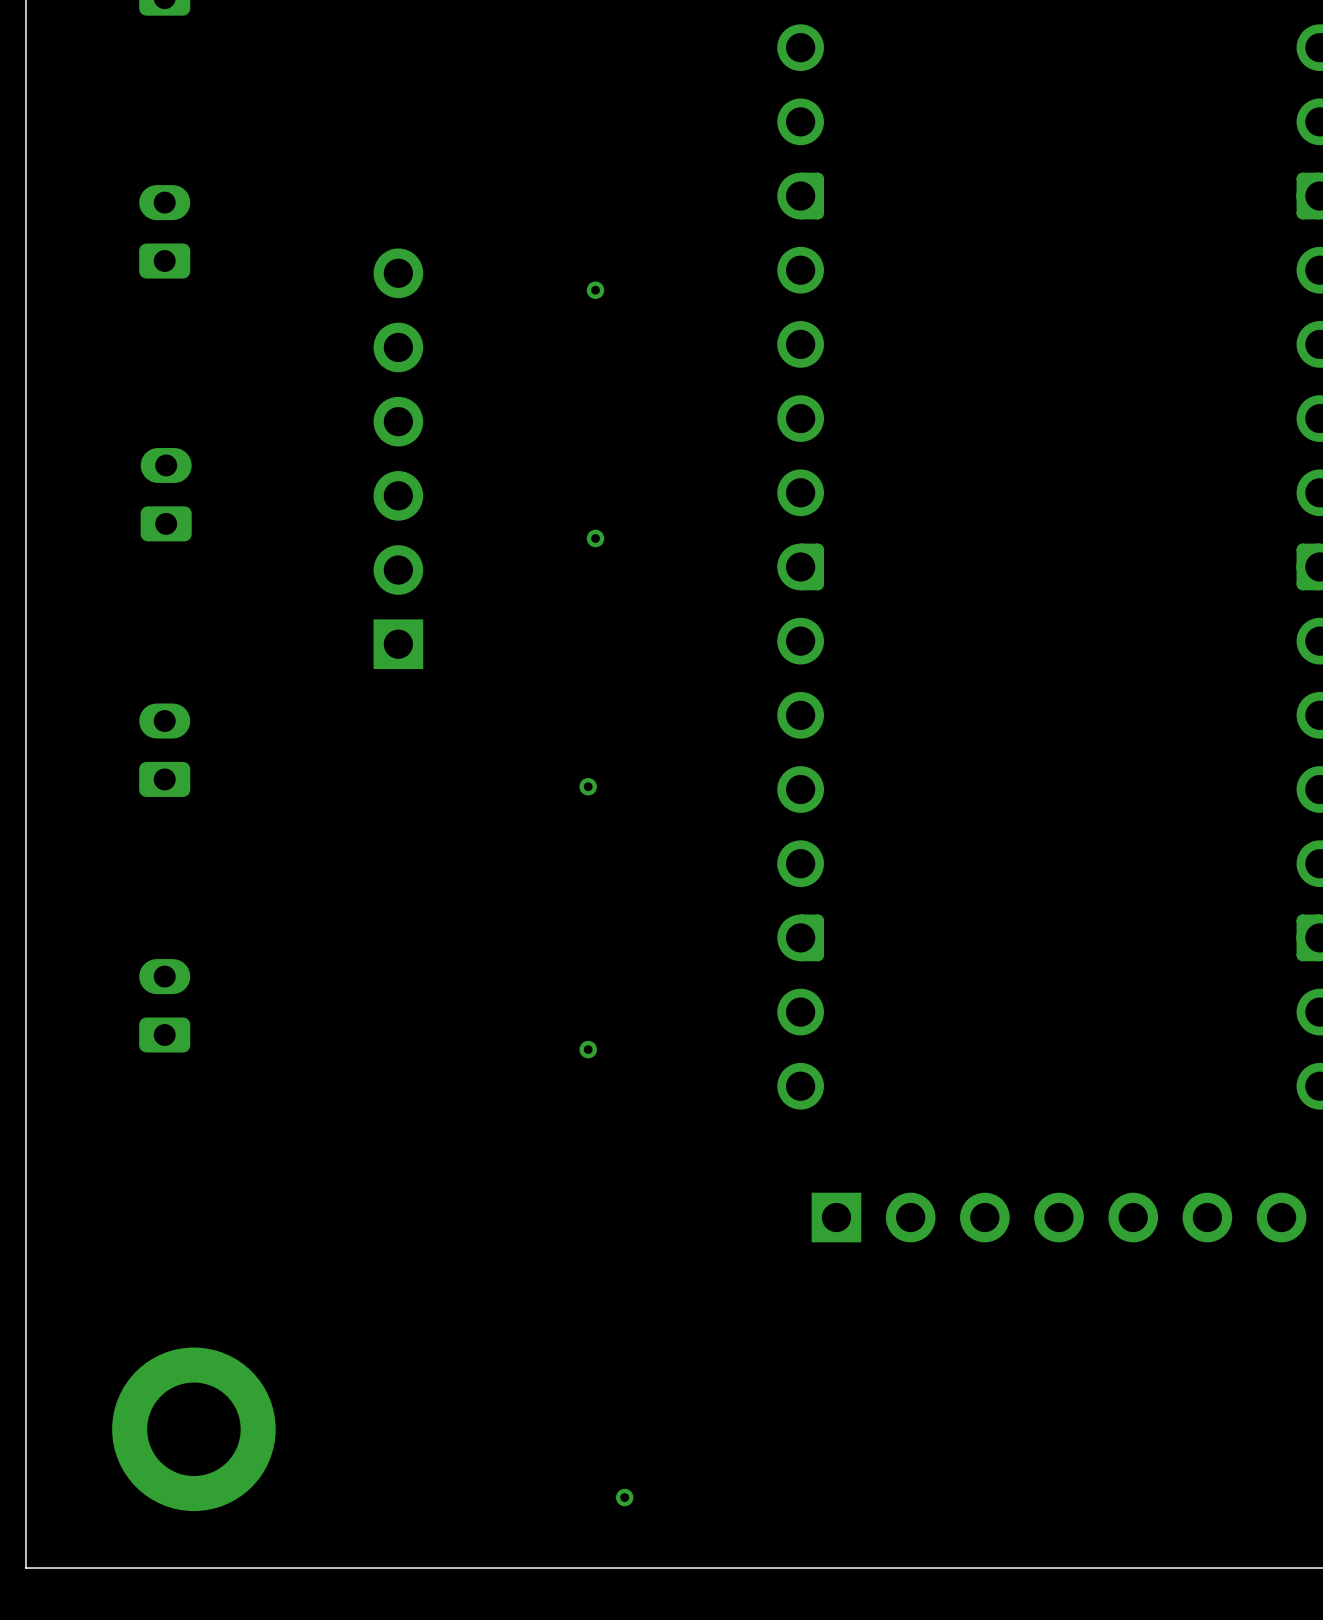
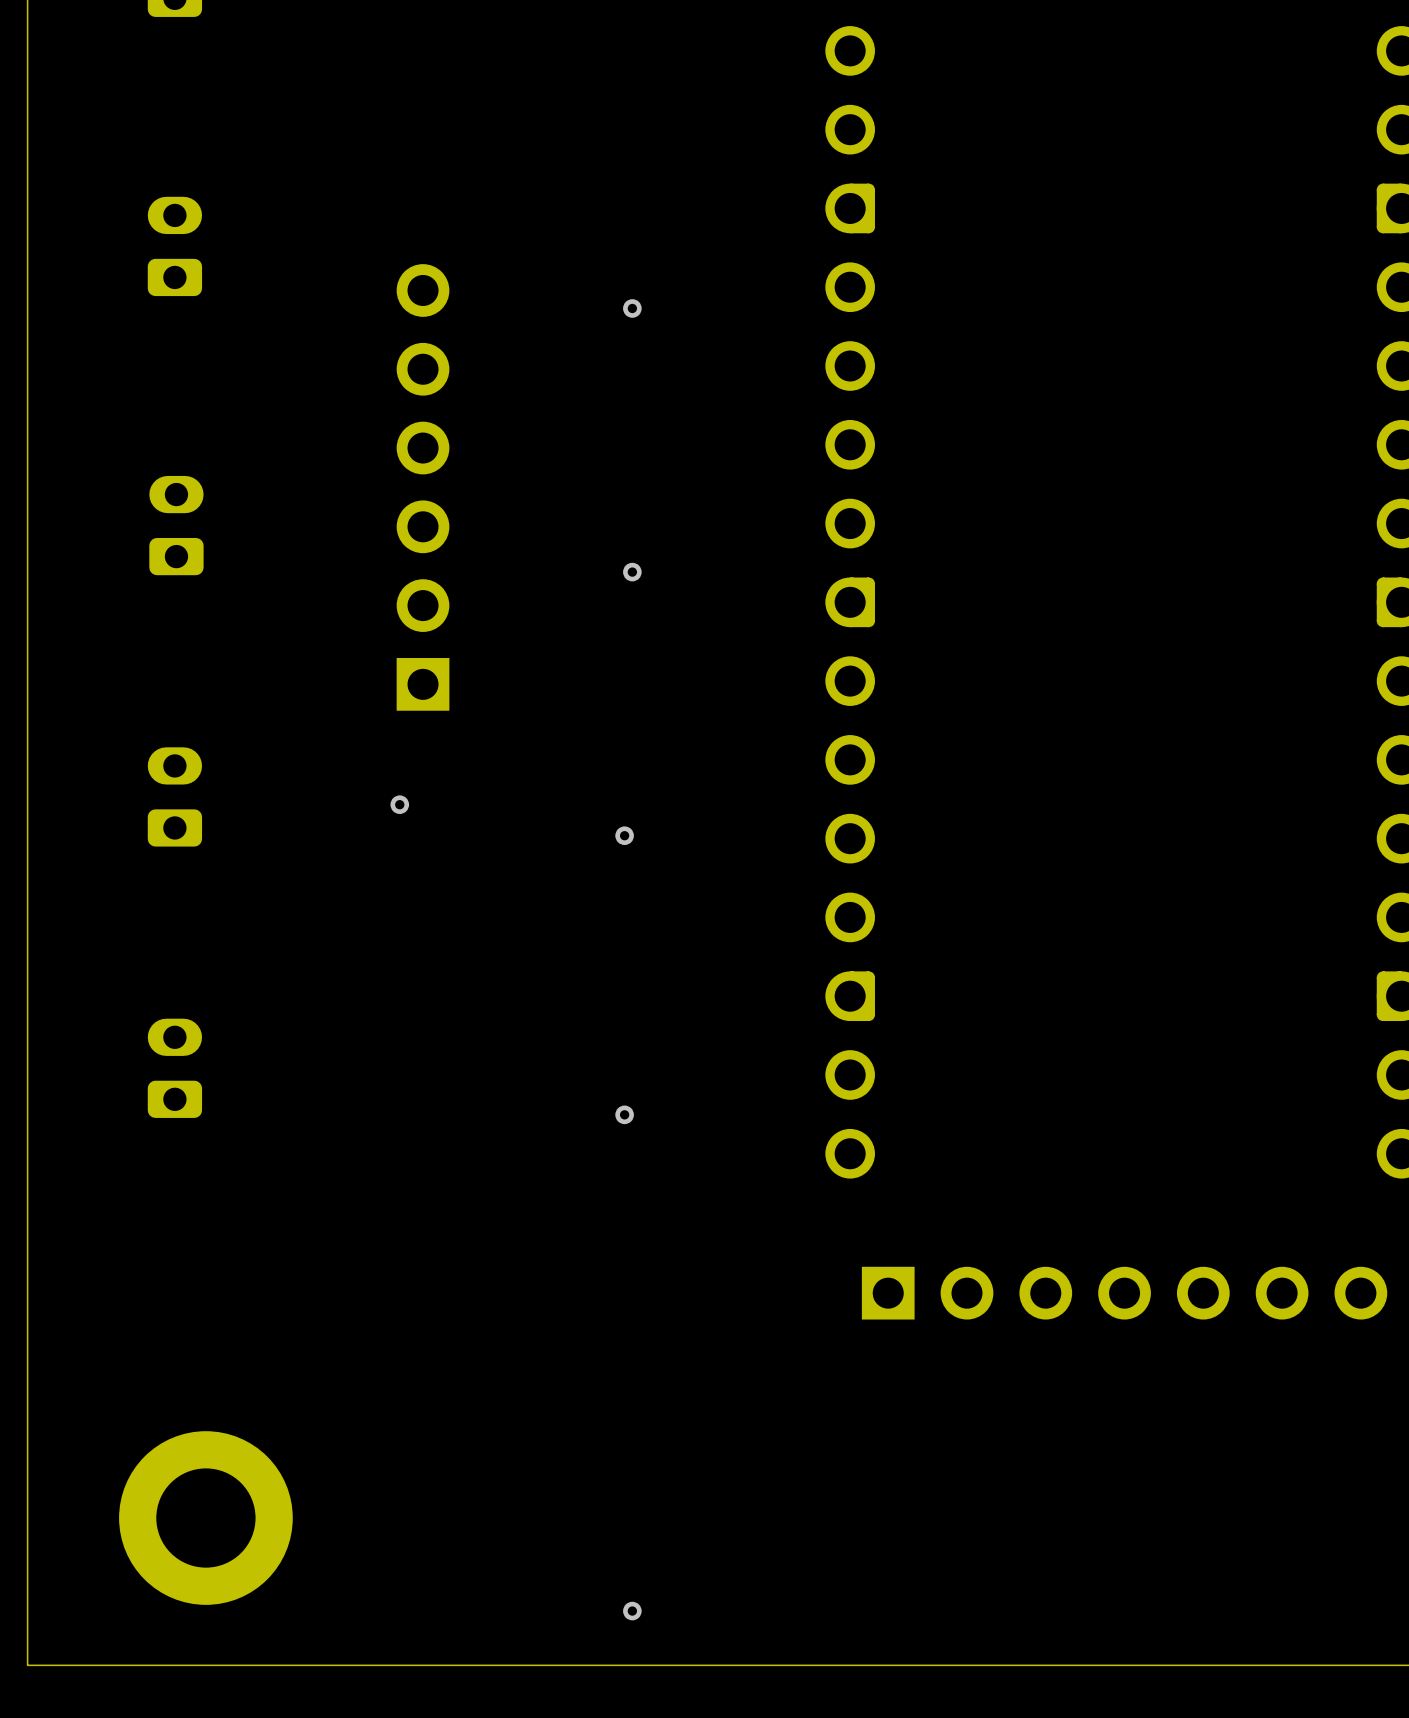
via: none -> (399, 804)
via position: (624, 1497) -> (632, 1611)

